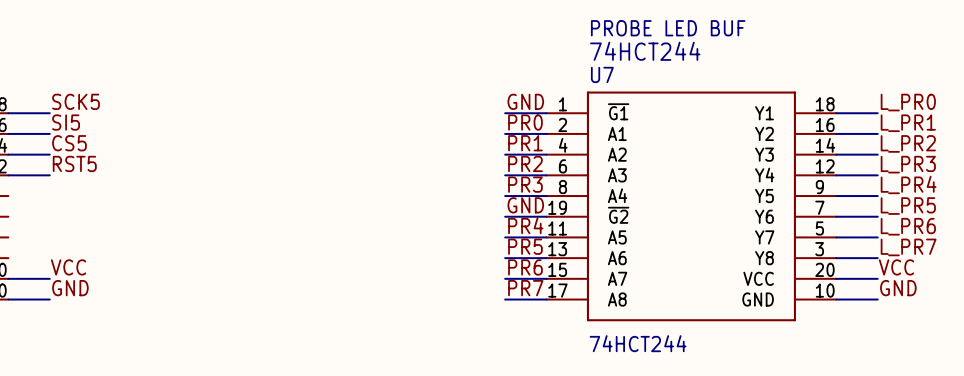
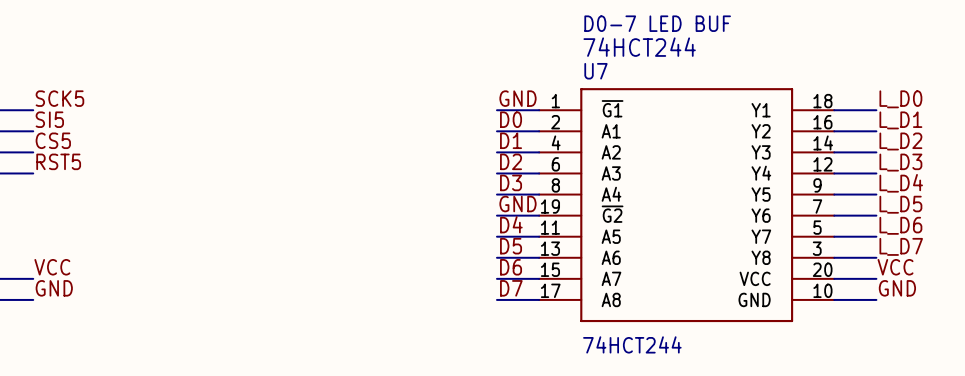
text: PROBE LED BUF (668, 28) -> D0-7 LED BUF (657, 23)
label: L_PR0 (908, 102) -> L_D0 (900, 99)
label: PR0 (525, 122) -> D0 (511, 119)
label: L_PR1 (908, 123) -> L_D1 (900, 120)
label: PR1 (525, 143) -> D1 (511, 140)
label: L_PR2 (908, 143) -> L_D2 (900, 141)
label: PR2 (525, 163) -> D2 (511, 161)
label: L_PR3 (908, 164) -> L_D3 (900, 162)
label: PR3 (525, 184) -> D3 (511, 182)
label: L_PR4 (908, 184) -> L_D4 (901, 183)
label: L_PR5 (908, 206) -> L_D5 (900, 204)
label: PR4 (525, 225) -> D4 (511, 224)
label: L_PR6 (908, 226) -> L_D6 (900, 225)
label: PR5 (525, 246) -> D5 (511, 246)
label: L_PR7 (908, 247) -> L_D7 (901, 246)
label: PR6 (525, 267) -> D6 (511, 267)
label: PR7 (525, 288) -> D7 (511, 288)

